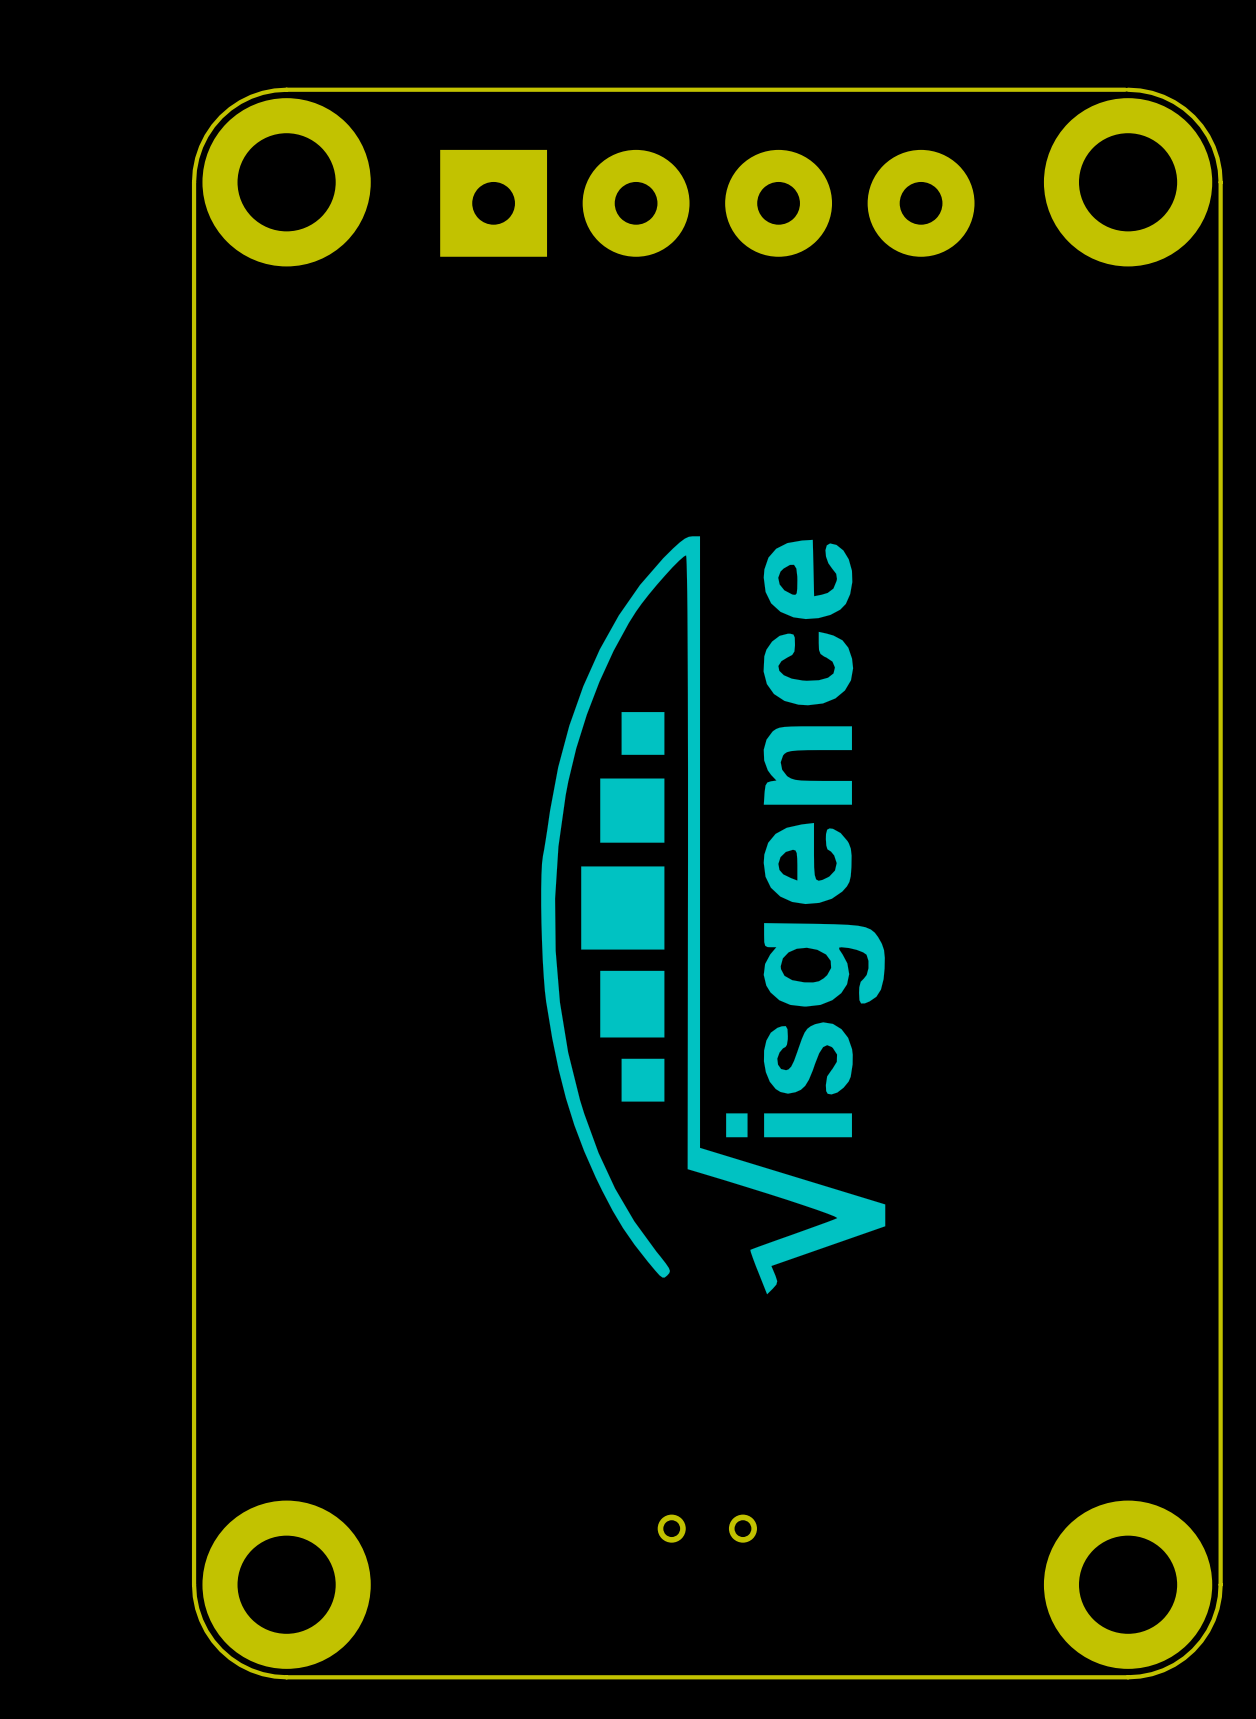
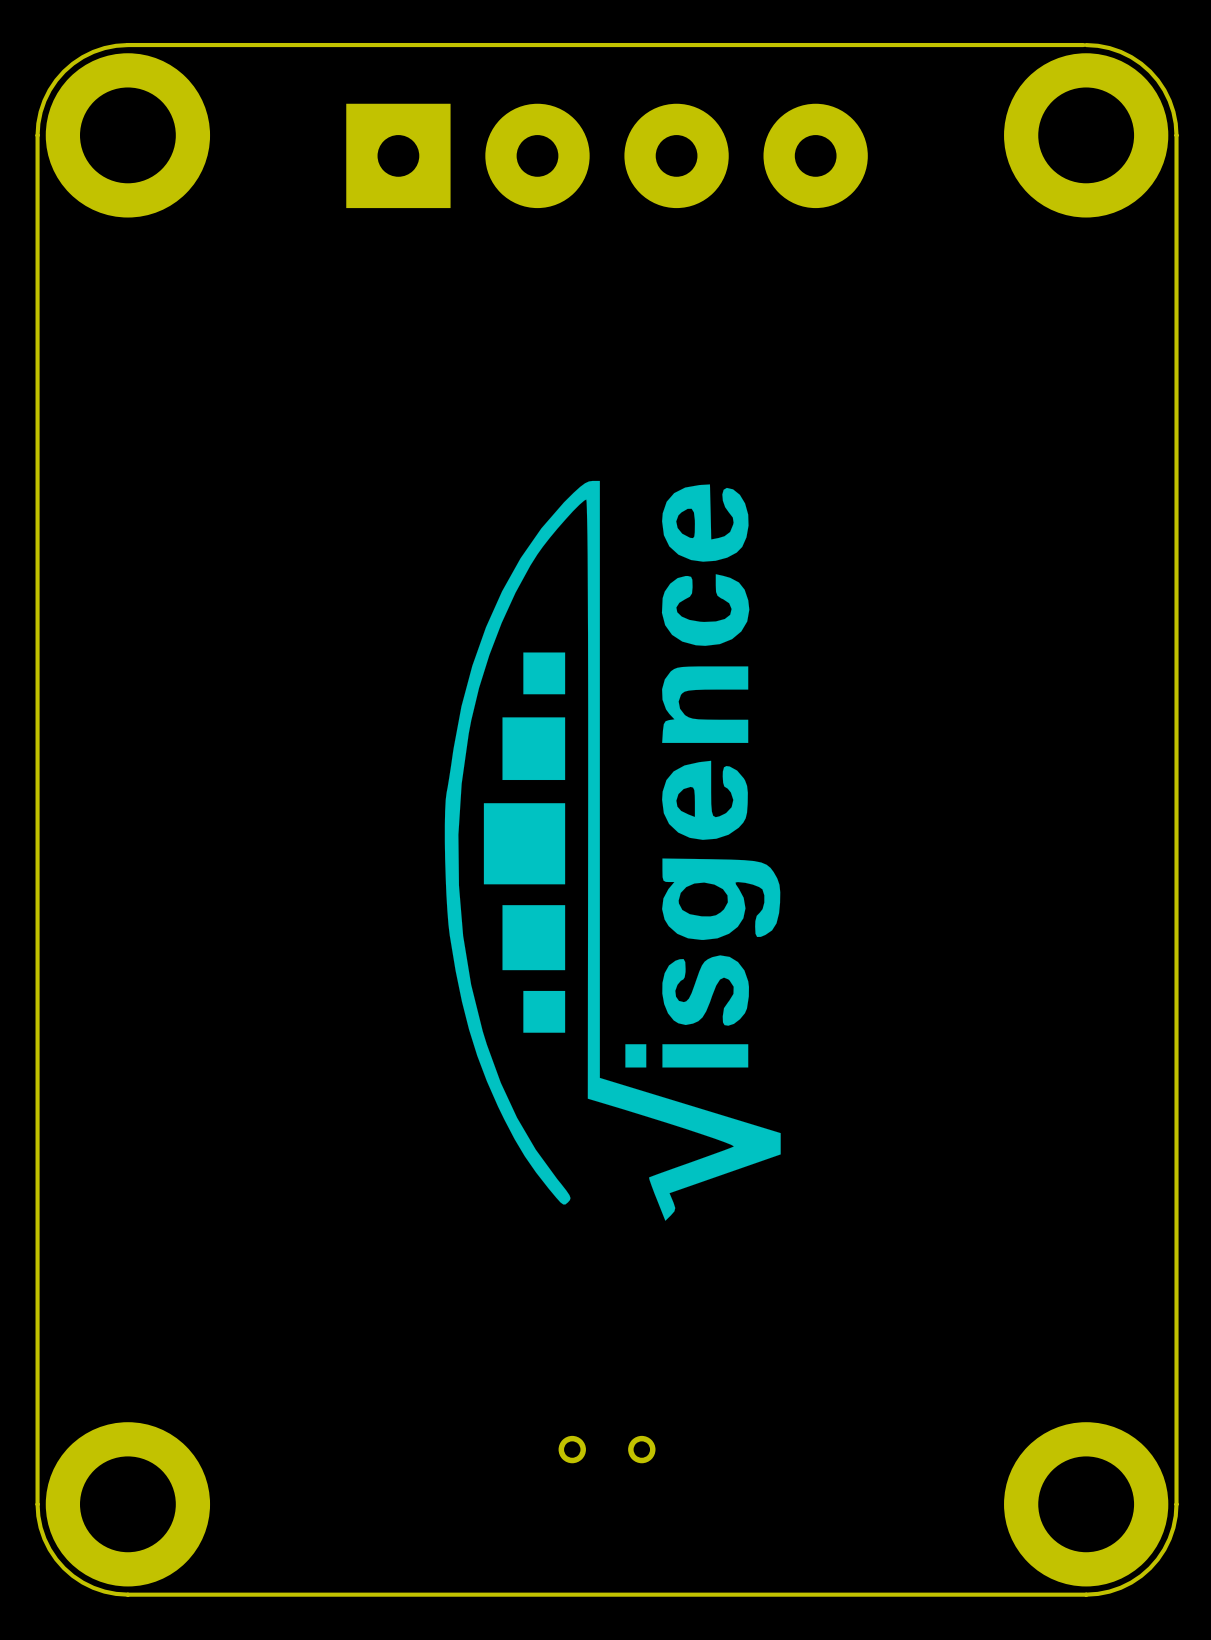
board edge: (286, 89) (274, 90) (251, 96) (240, 102) (221, 116) (213, 125) (201, 146) (197, 158) (194, 182) (194, 1584) (197, 1608) (201, 1620) (213, 1641) (221, 1650) (240, 1664) (251, 1670) (262, 1674) (286, 1677) -> (264, 45) (127, 45) (116, 45) (93, 51) (72, 63) (56, 80) (49, 90) (40, 112) (37, 135) (38, 1516) (44, 1538) (56, 1559) (72, 1576) (93, 1587) (104, 1591) (127, 1594) (264, 1594)
part position: (286, 182) -> (127, 135)
part position: (707, 203) -> (607, 155)
drawing position: (713, 915) -> (612, 850)
part position: (707, 1528) -> (607, 1449)
part position: (286, 1584) -> (127, 1504)

